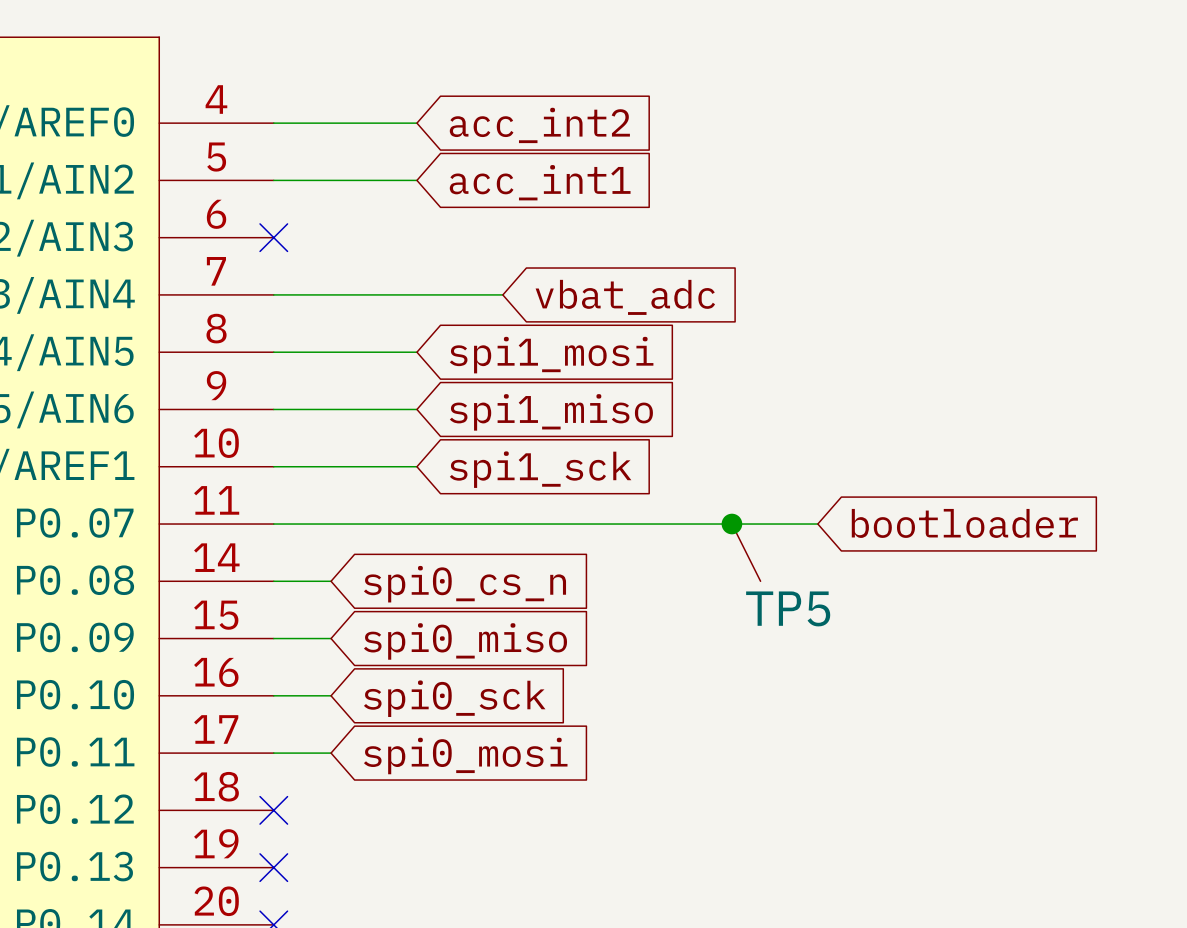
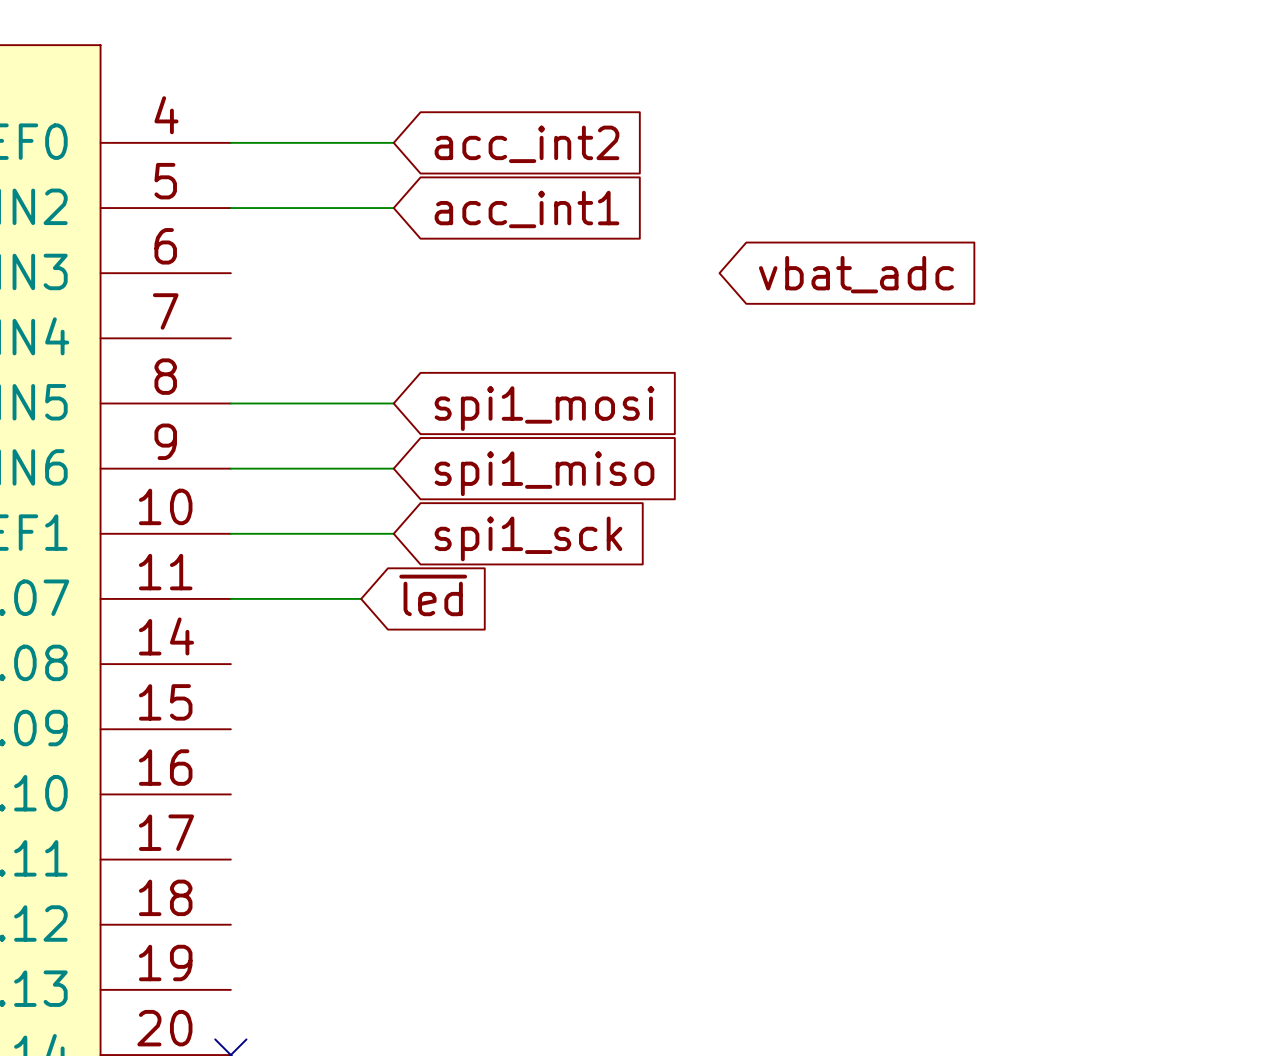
no-connect mark: (273, 237) -> none
wire: (273, 294) (502, 294) -> none
global label position: vbat_adc (625, 297) -> vbat_adc (856, 274)
global label: none -> ~{led} (433, 595)
global label: bootloader (964, 523) -> none
wire: (388, 524) (817, 524) -> none
junction: (731, 524) -> none
TP5: (746, 552) -> none
wire: (273, 581) (331, 581) -> none
global label: spi0_cs_n (464, 584) -> none
wire: (273, 638) (331, 638) -> none
global label: spi0_miso (465, 641) -> none
wire: (273, 695) (331, 695) -> none
global label: spi0_sck (454, 698) -> none
wire: (273, 753) (331, 753) -> none
global label: spi0_mosi (465, 755) -> none
no-connect mark: (273, 810) -> none
no-connect mark: (273, 867) -> none

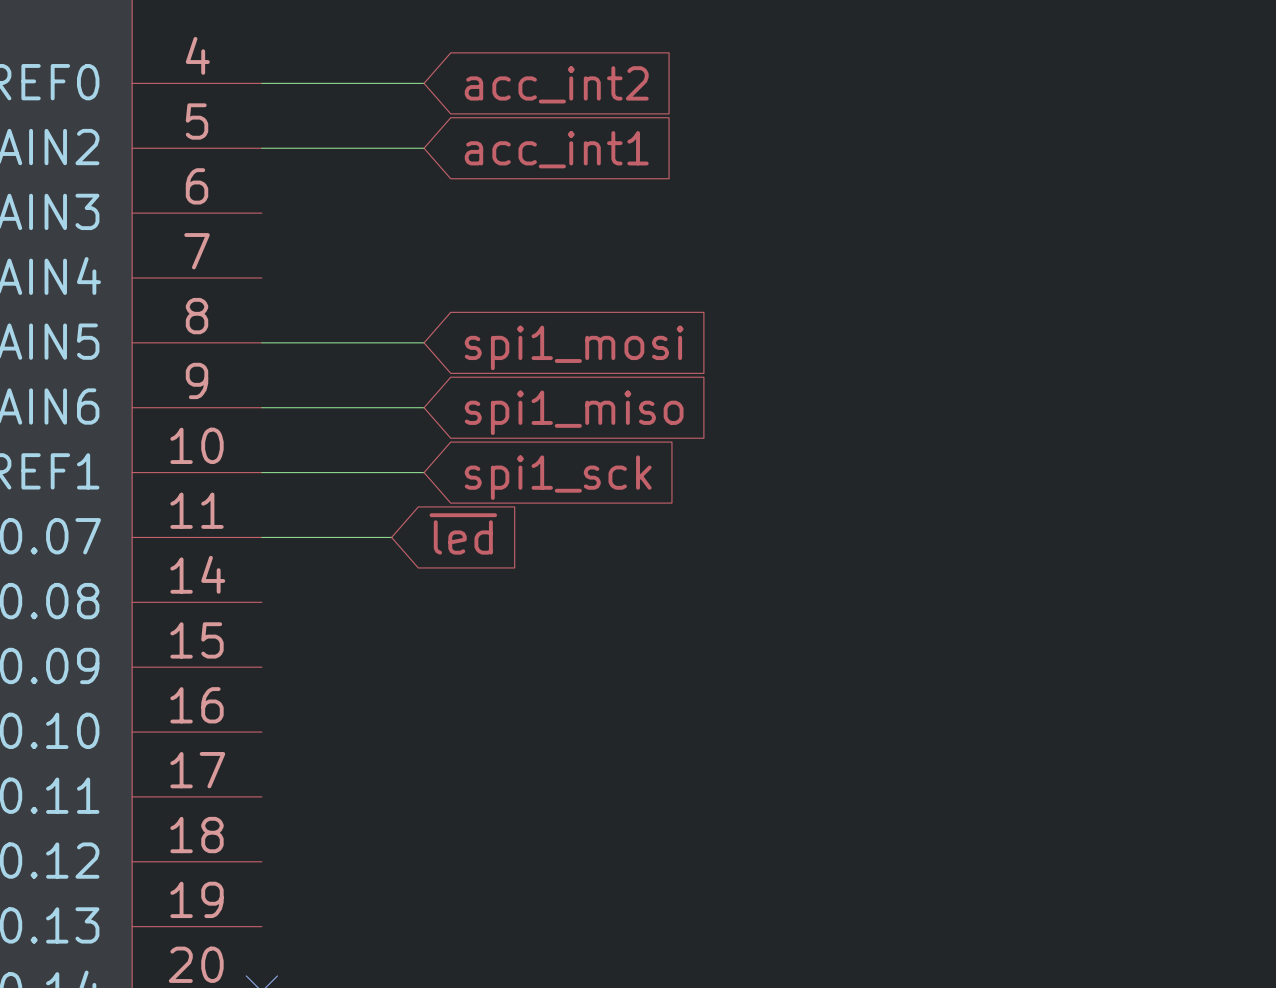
global label: vbat_adc (856, 274) -> none

